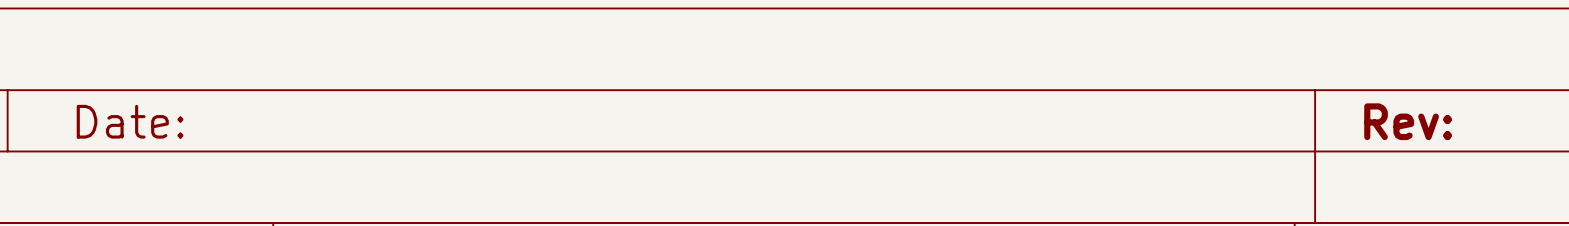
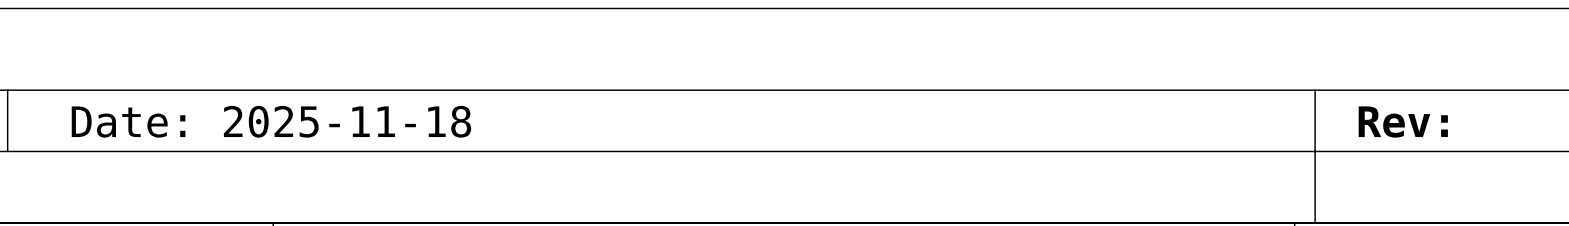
title block: Date: (130, 121) -> Date: 2025-11-18 (271, 121)

